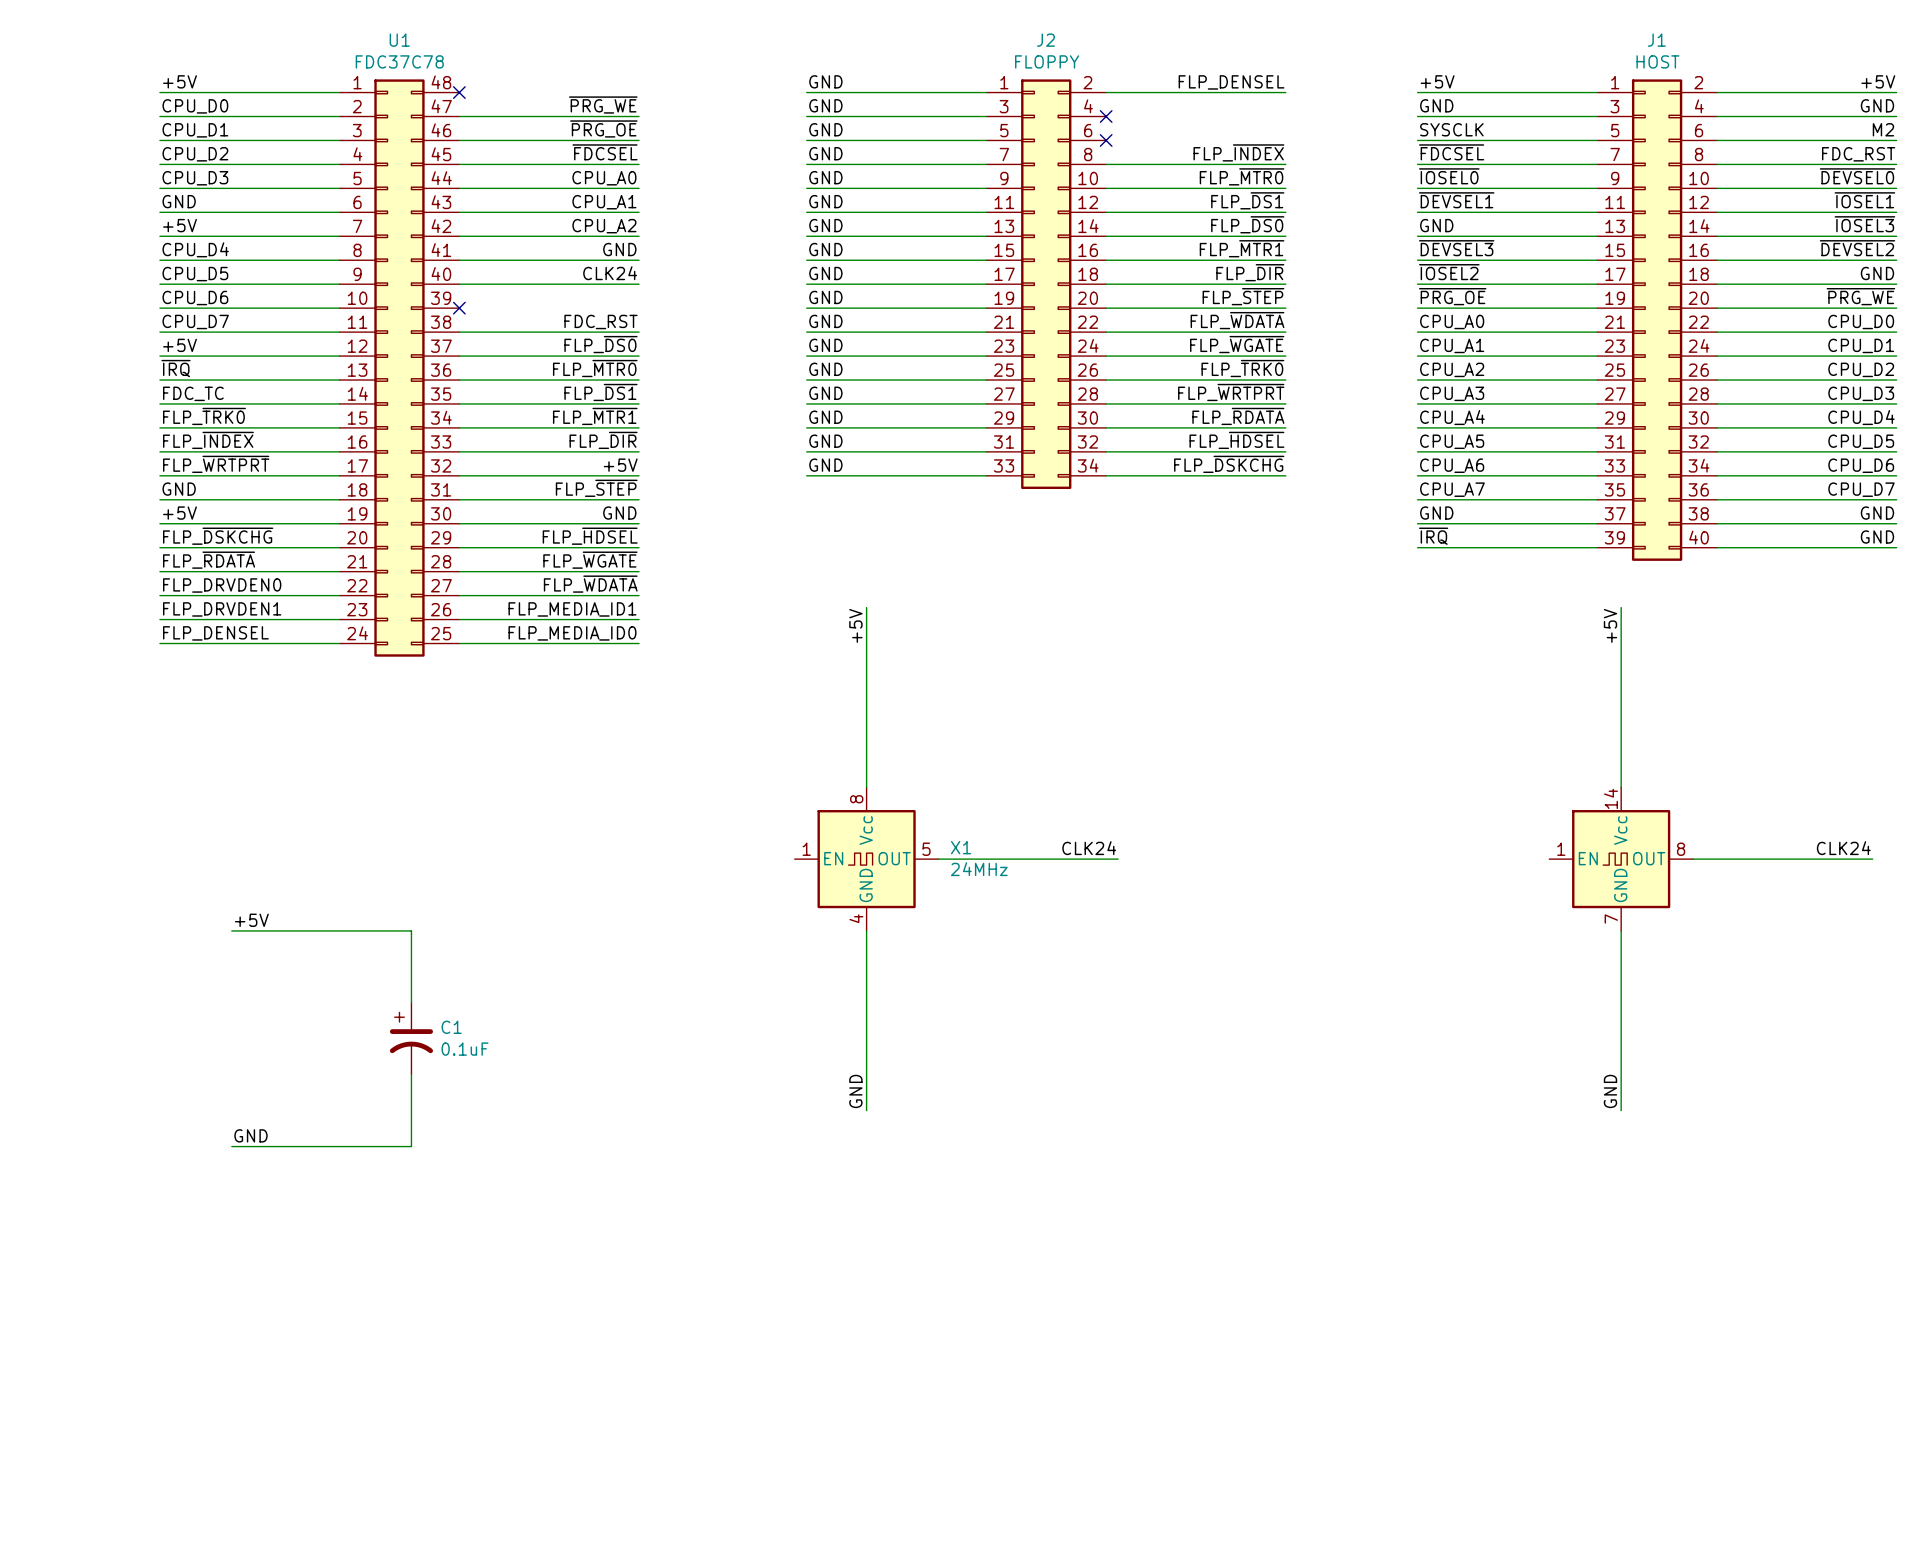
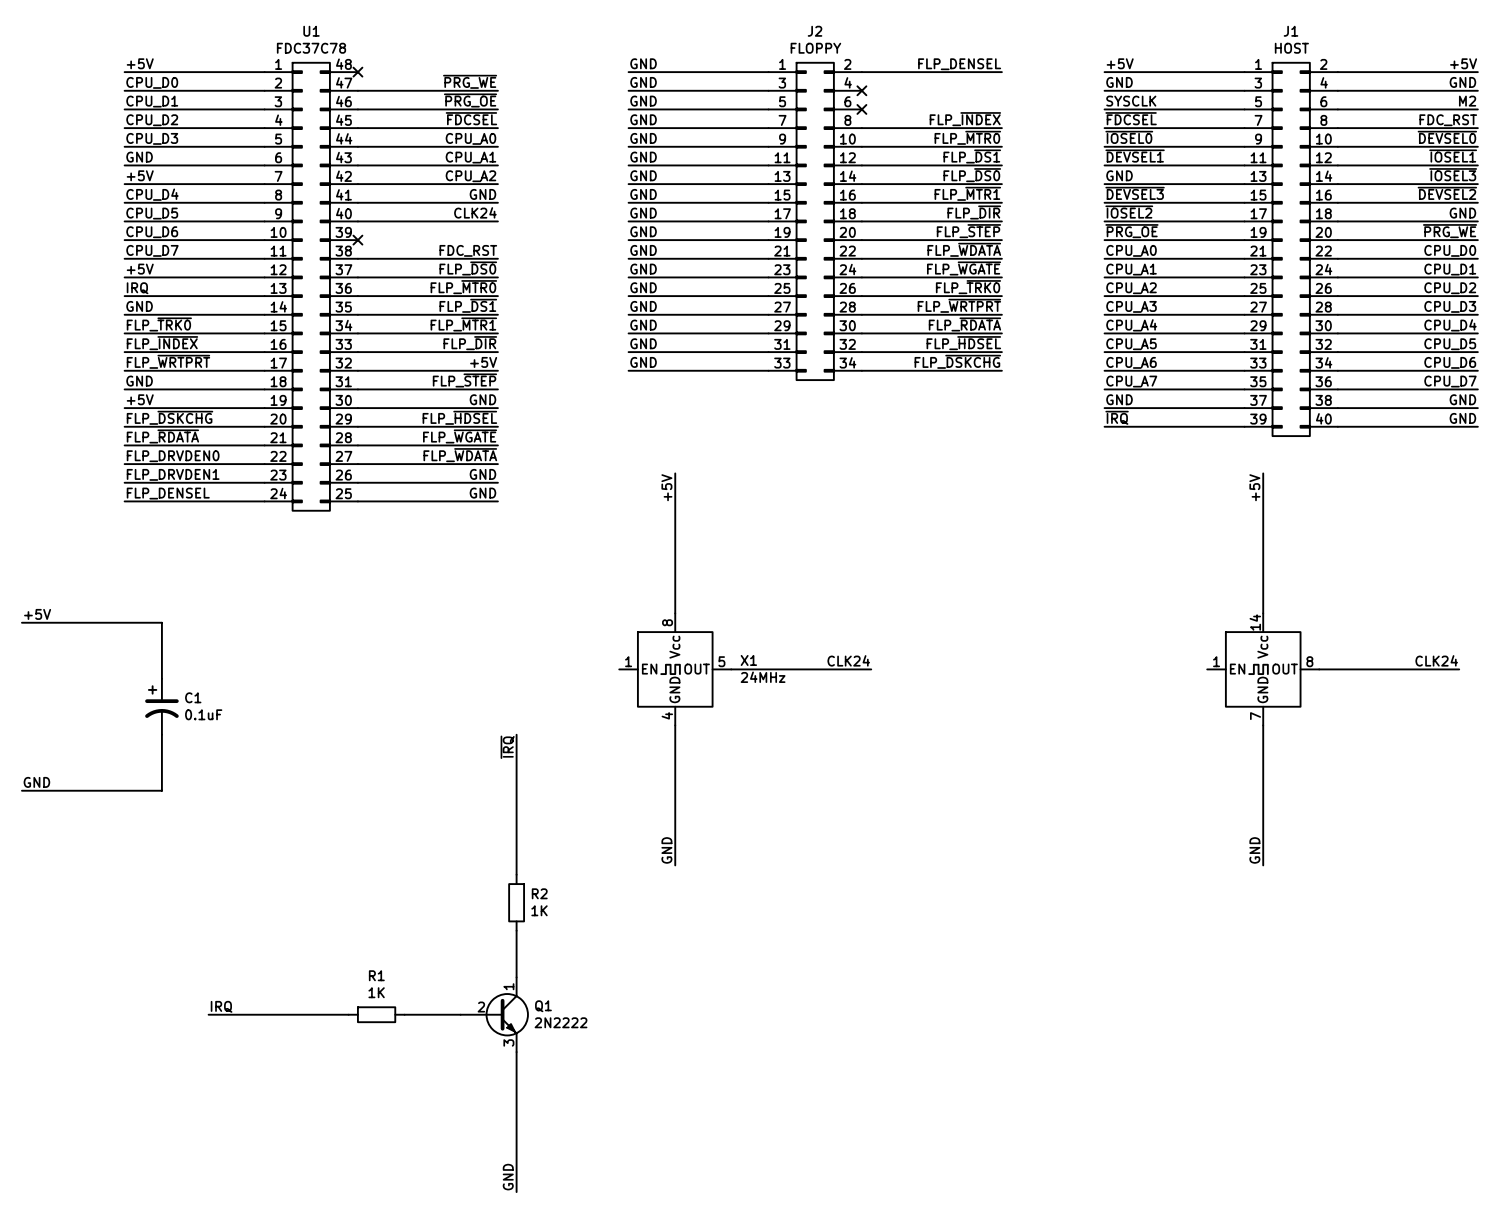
label: ~{IRQ} (175, 368) -> IRQ (137, 288)
label: FDC_TC (193, 393) -> GND (139, 306)
label: FLP_MEDIA_ID1 (572, 609) -> GND (482, 474)
label: FLP_MEDIA_ID0 (572, 633) -> GND (482, 493)
label: none -> +5V (37, 614)
wire: none -> (21, 622) (161, 622) (161, 678)
label: +5V (251, 920) -> none
wire: (231, 930) (411, 930) (411, 1002) -> none
wire: none -> (161, 734) (161, 790) (21, 790)
wire: none -> (516, 734) (516, 874)
label: none -> ~{IRQ} (507, 747)
label: none -> GND (36, 782)
C1 position: (411, 1038) -> (161, 706)
wire: (411, 1074) (411, 1146) (231, 1146) -> none
label: GND (250, 1135) -> none
R2: none -> 1K (516, 902)
wire: none -> (516, 930) (516, 977)
label: none -> IRQ (221, 1006)
wire: none -> (208, 1014) (348, 1014)
R1: none -> 1K (376, 1014)
wire: none -> (404, 1014) (460, 1014)
Q1: none -> 2N2222 (494, 1014)
wire: none -> (516, 1052) (516, 1192)
label: none -> GND (508, 1177)

